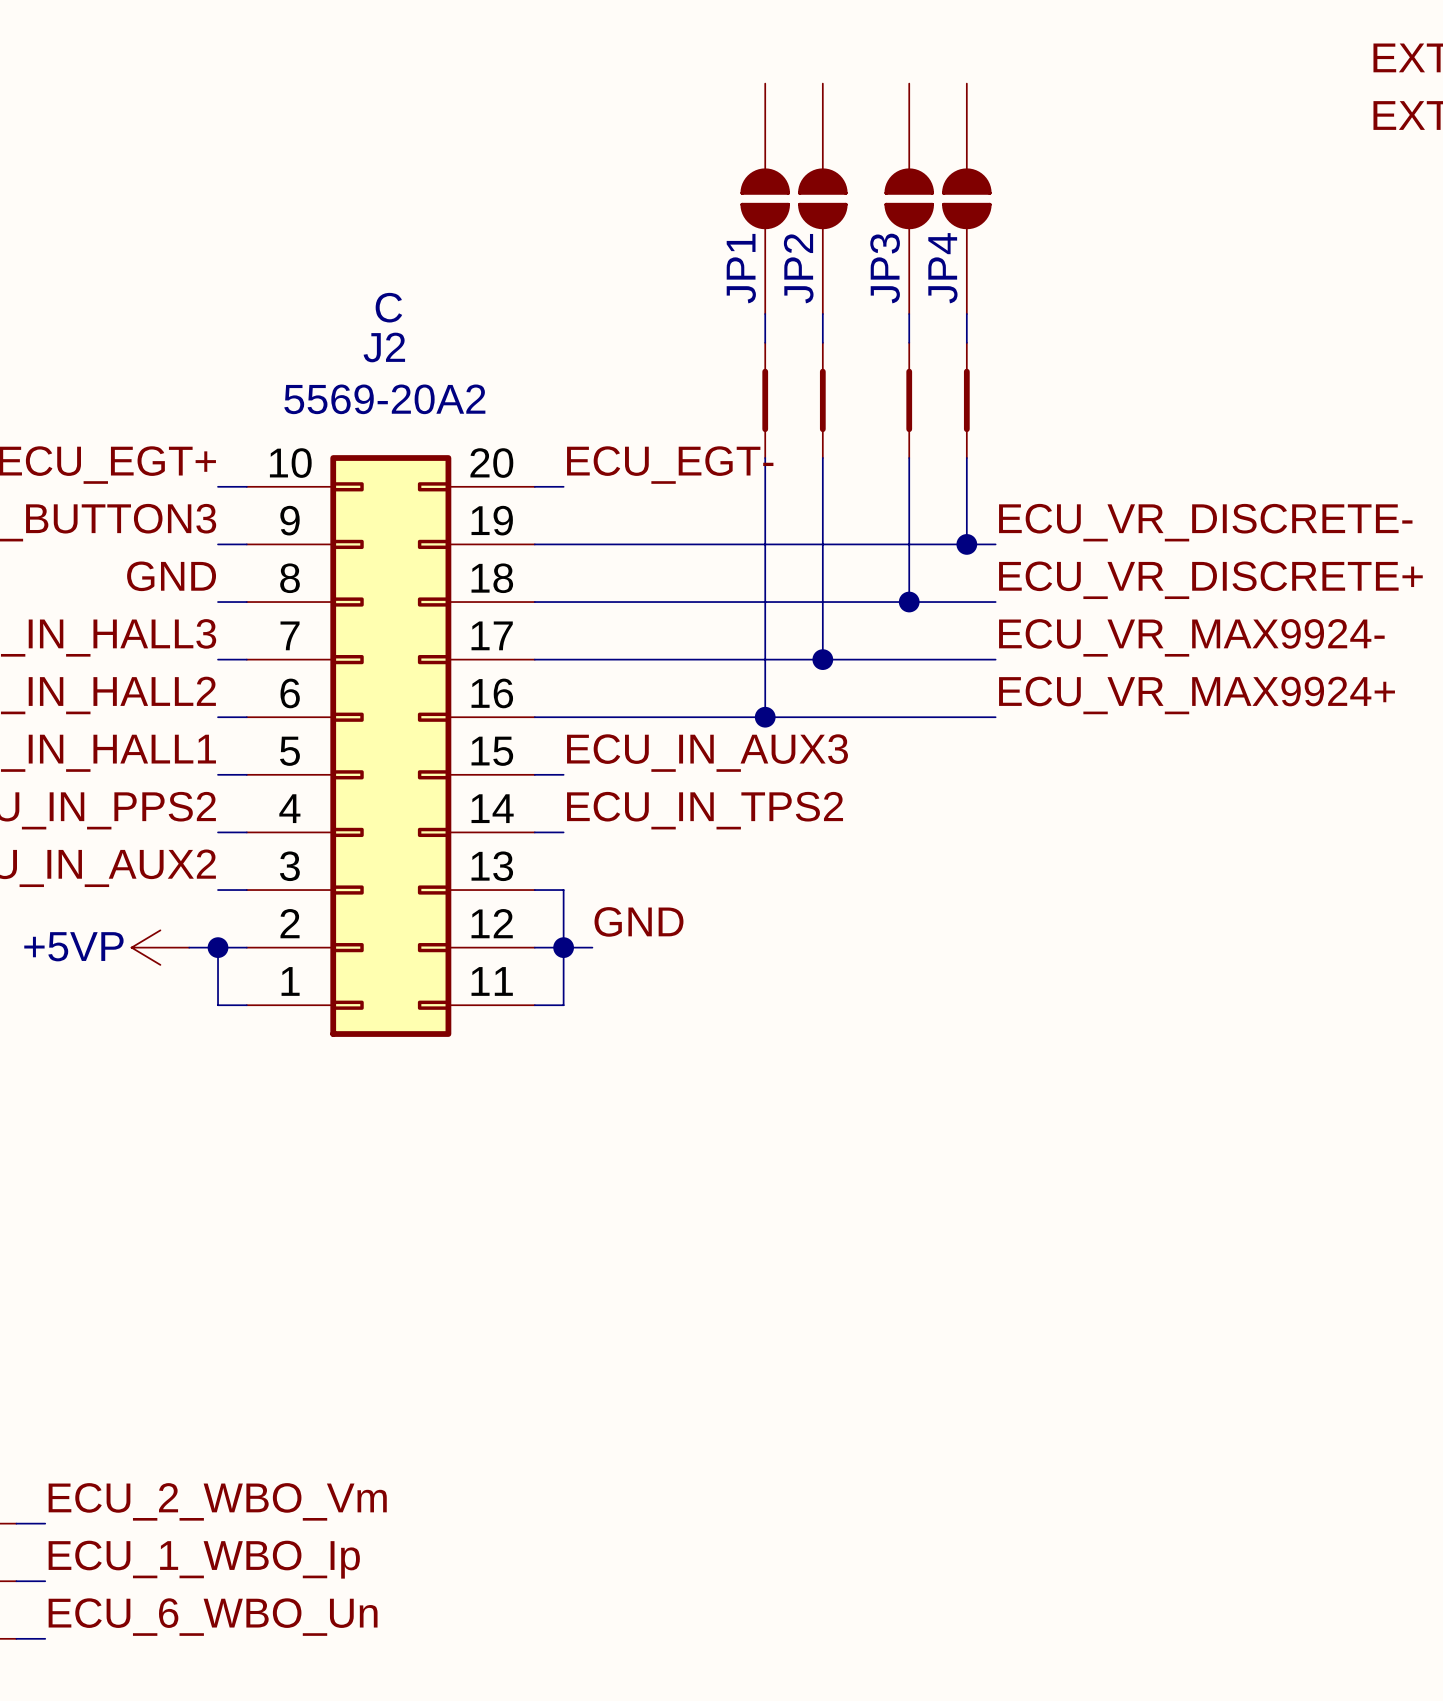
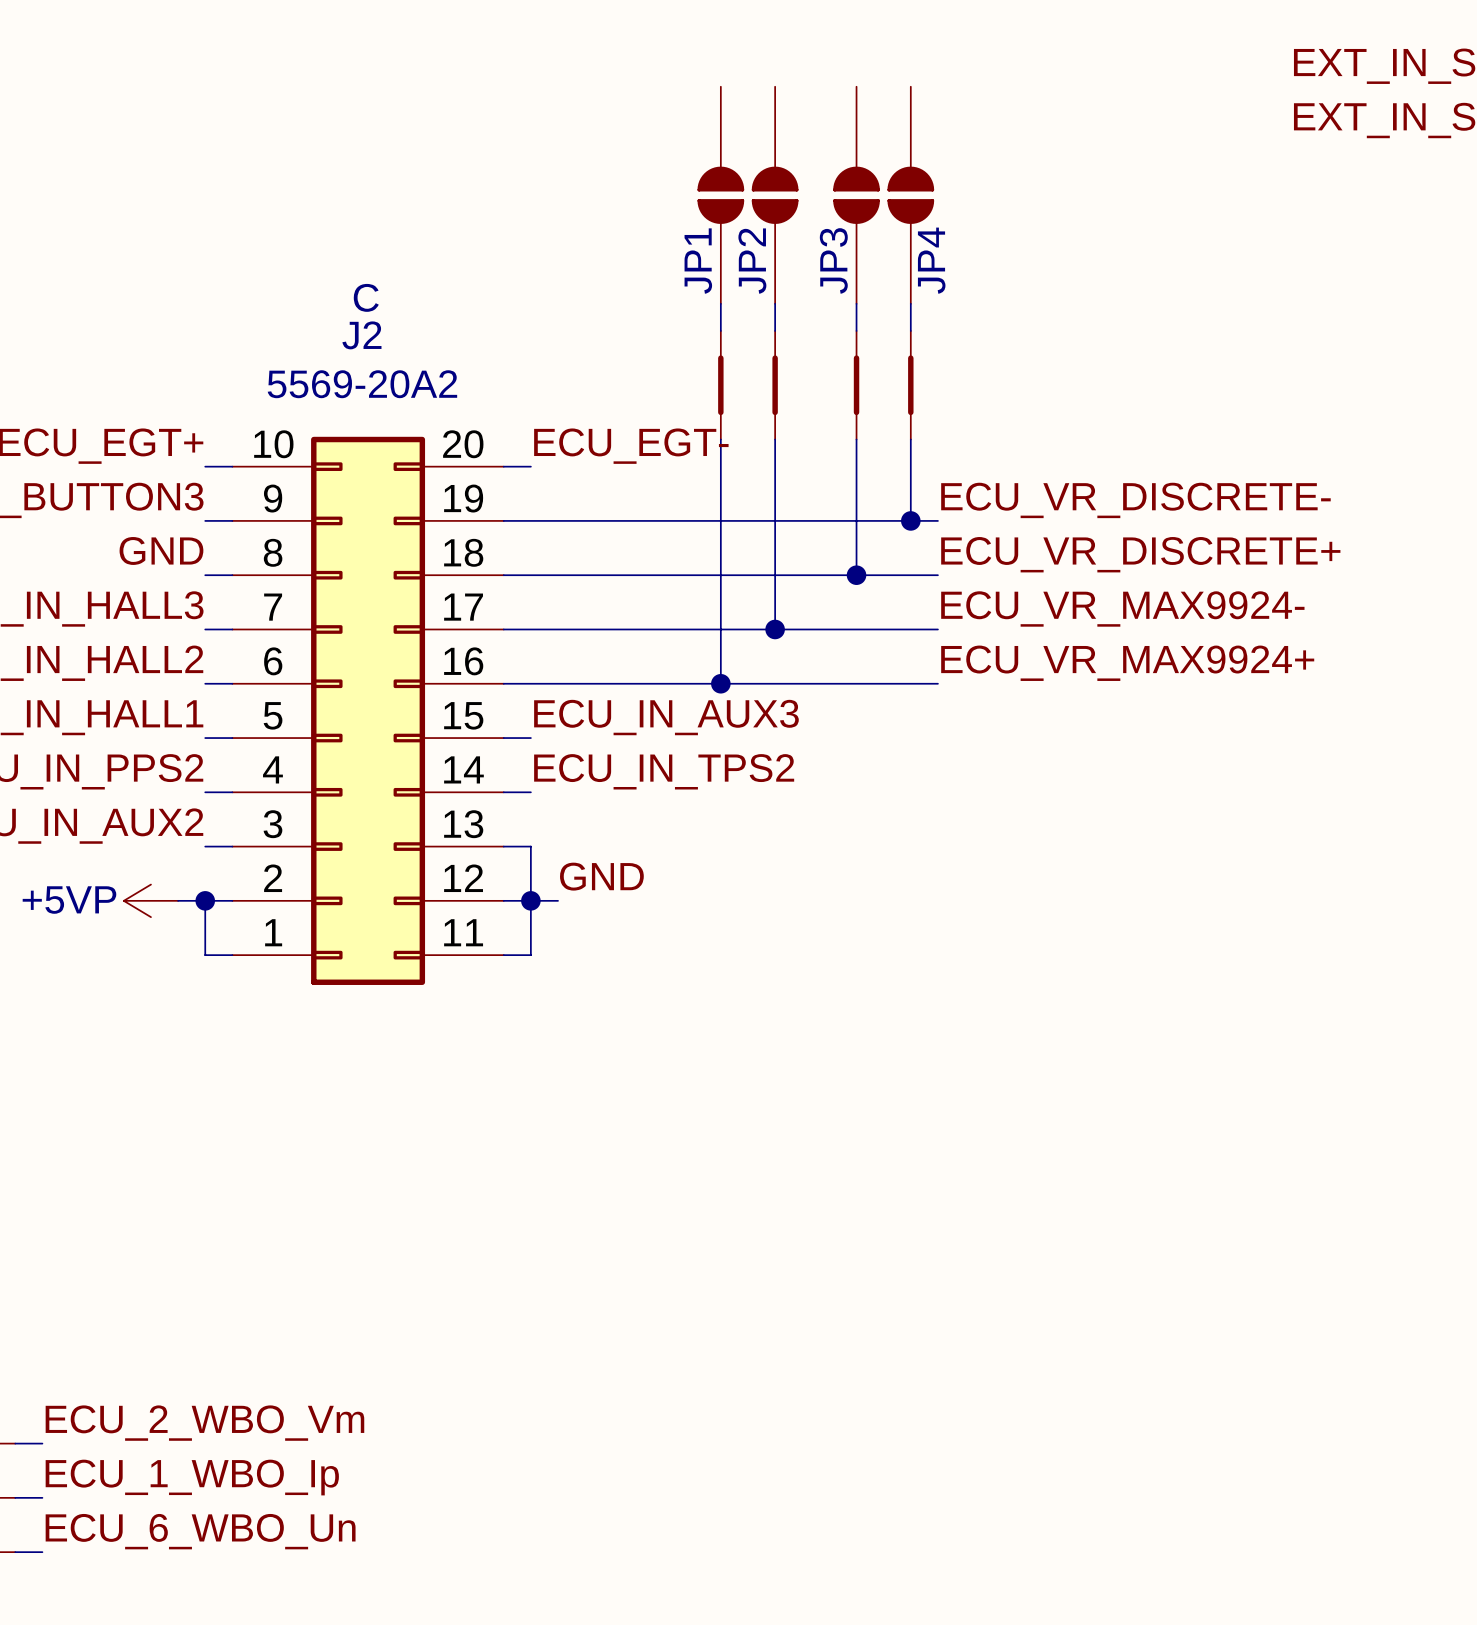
JP4 name position: JP4 (942, 268) -> JP4 (931, 260)

